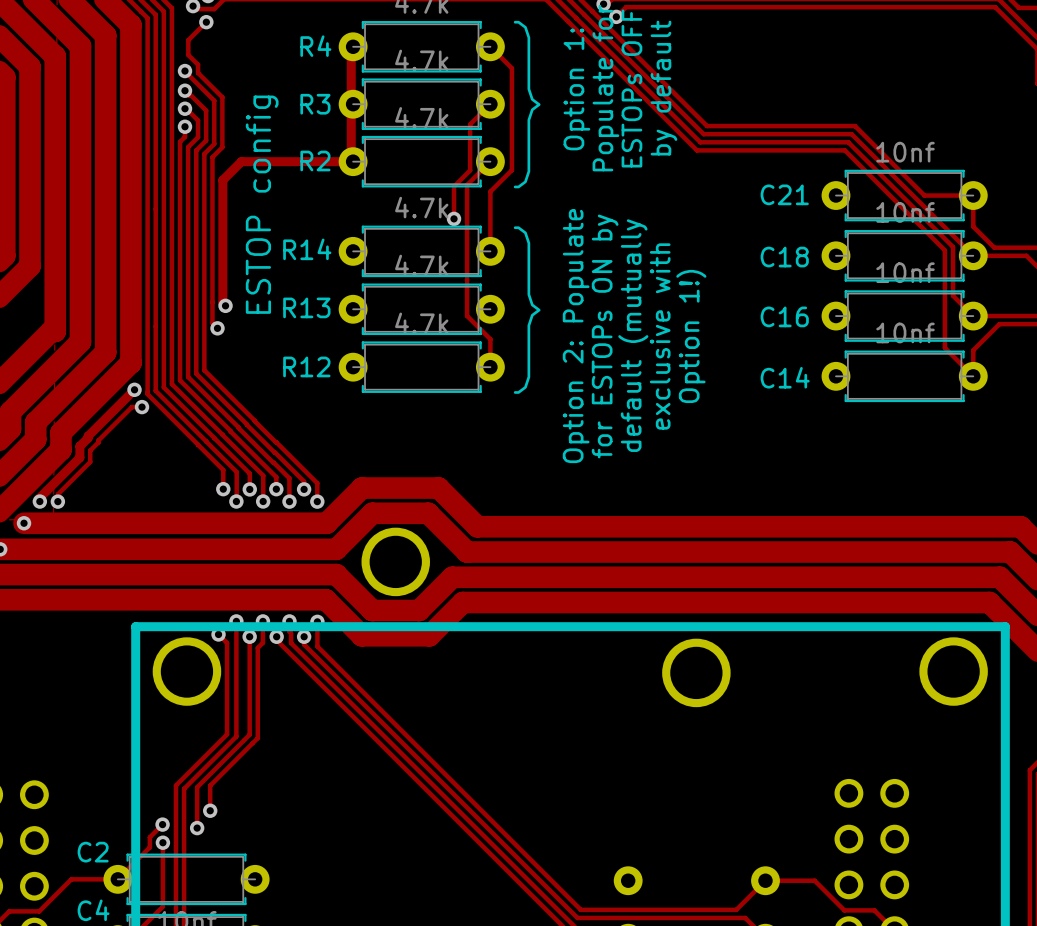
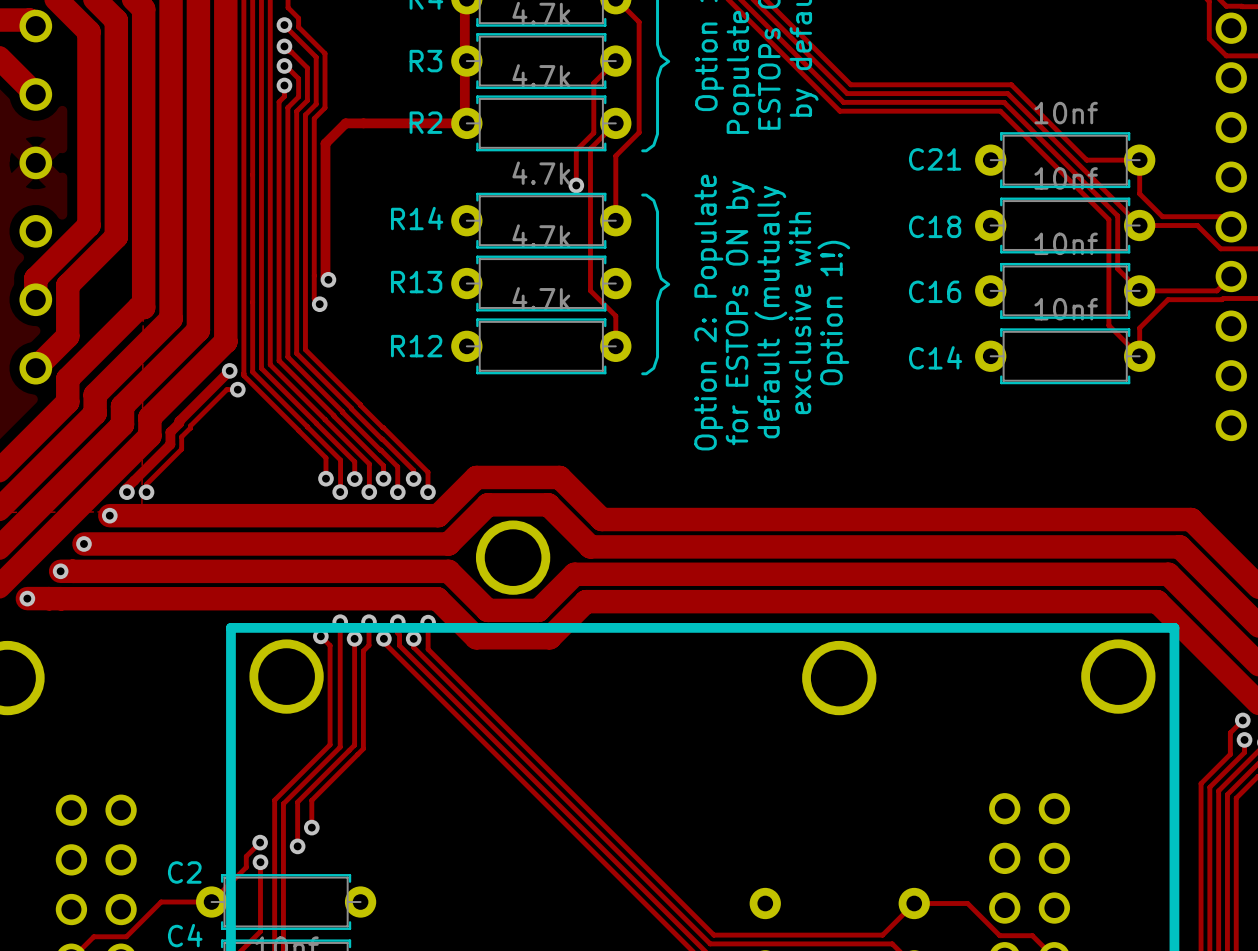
text: ESTOP config (262, 204) -> none

